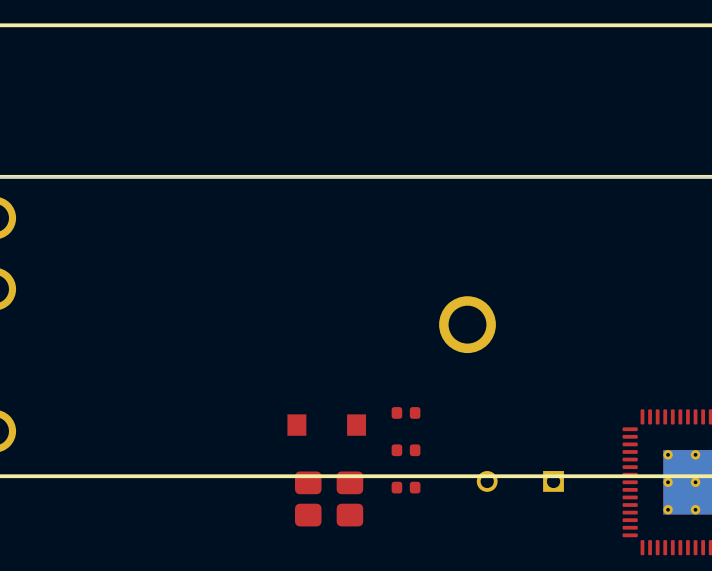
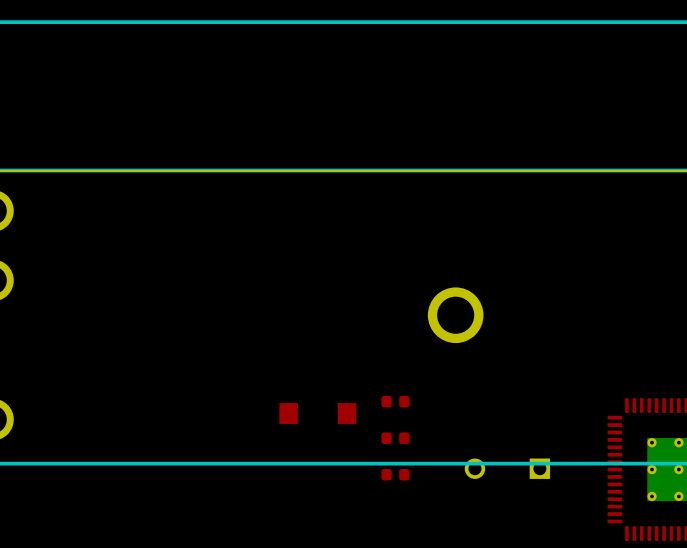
part: (329, 498) -> none

